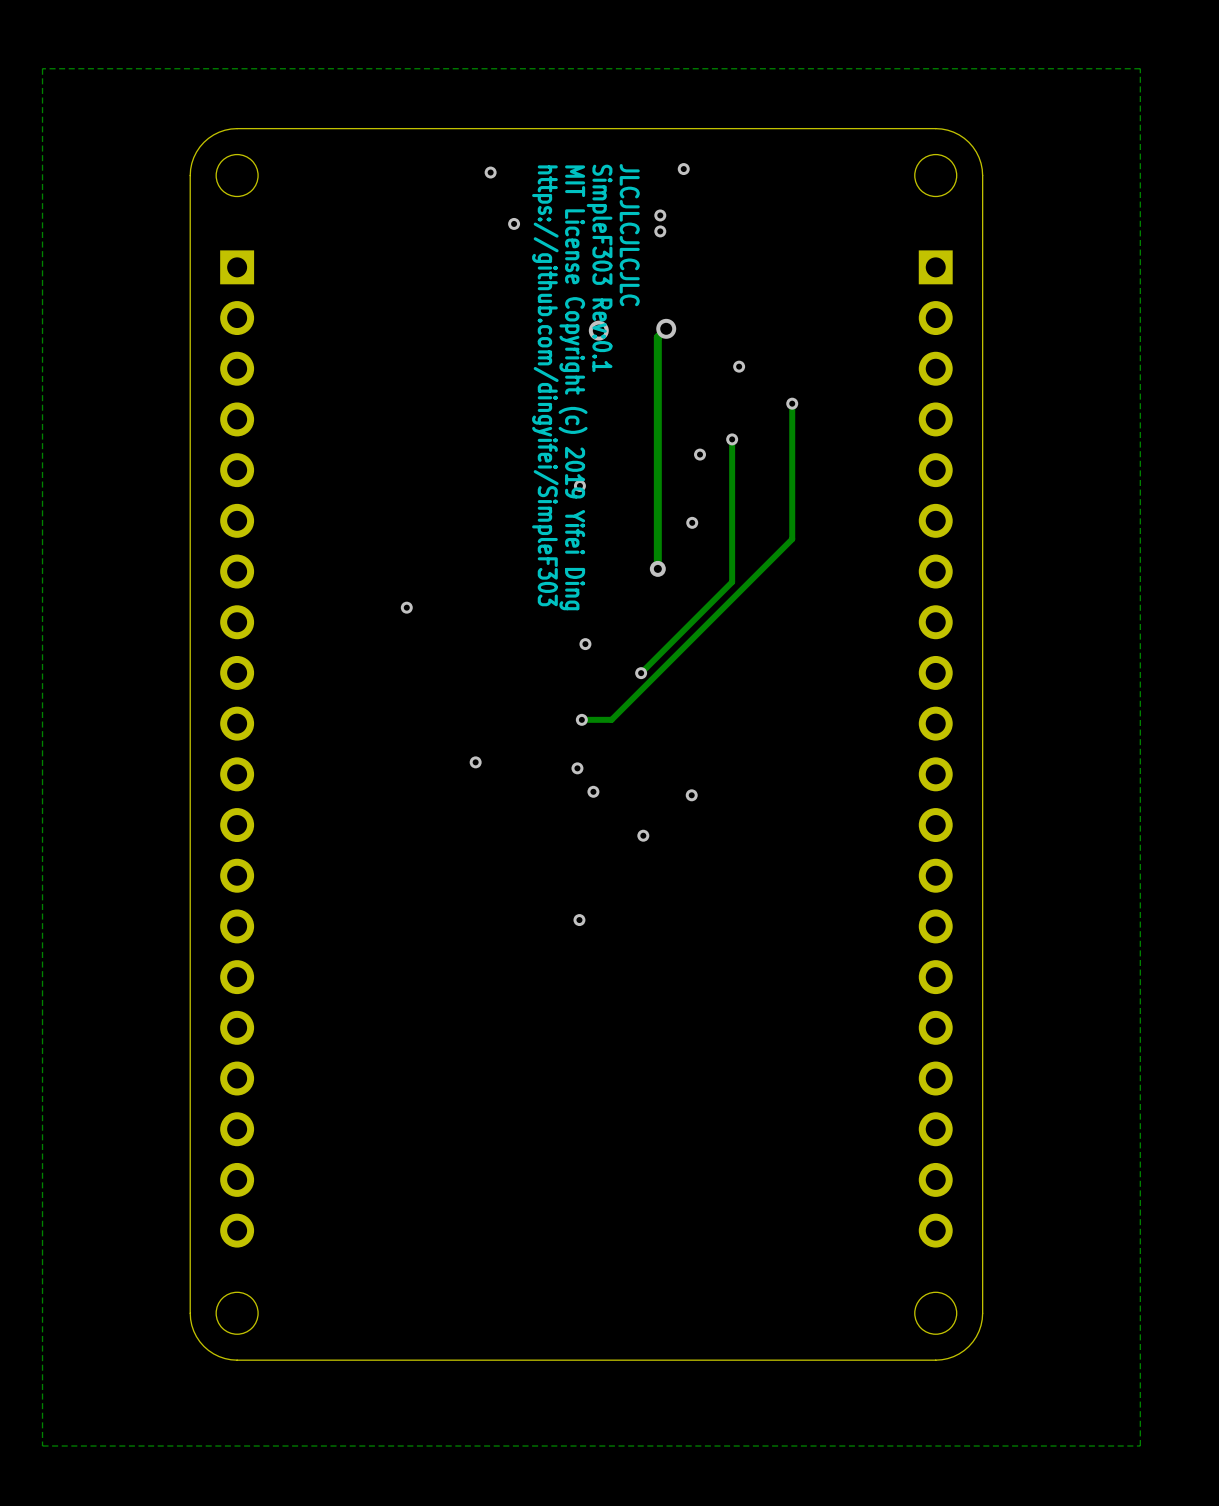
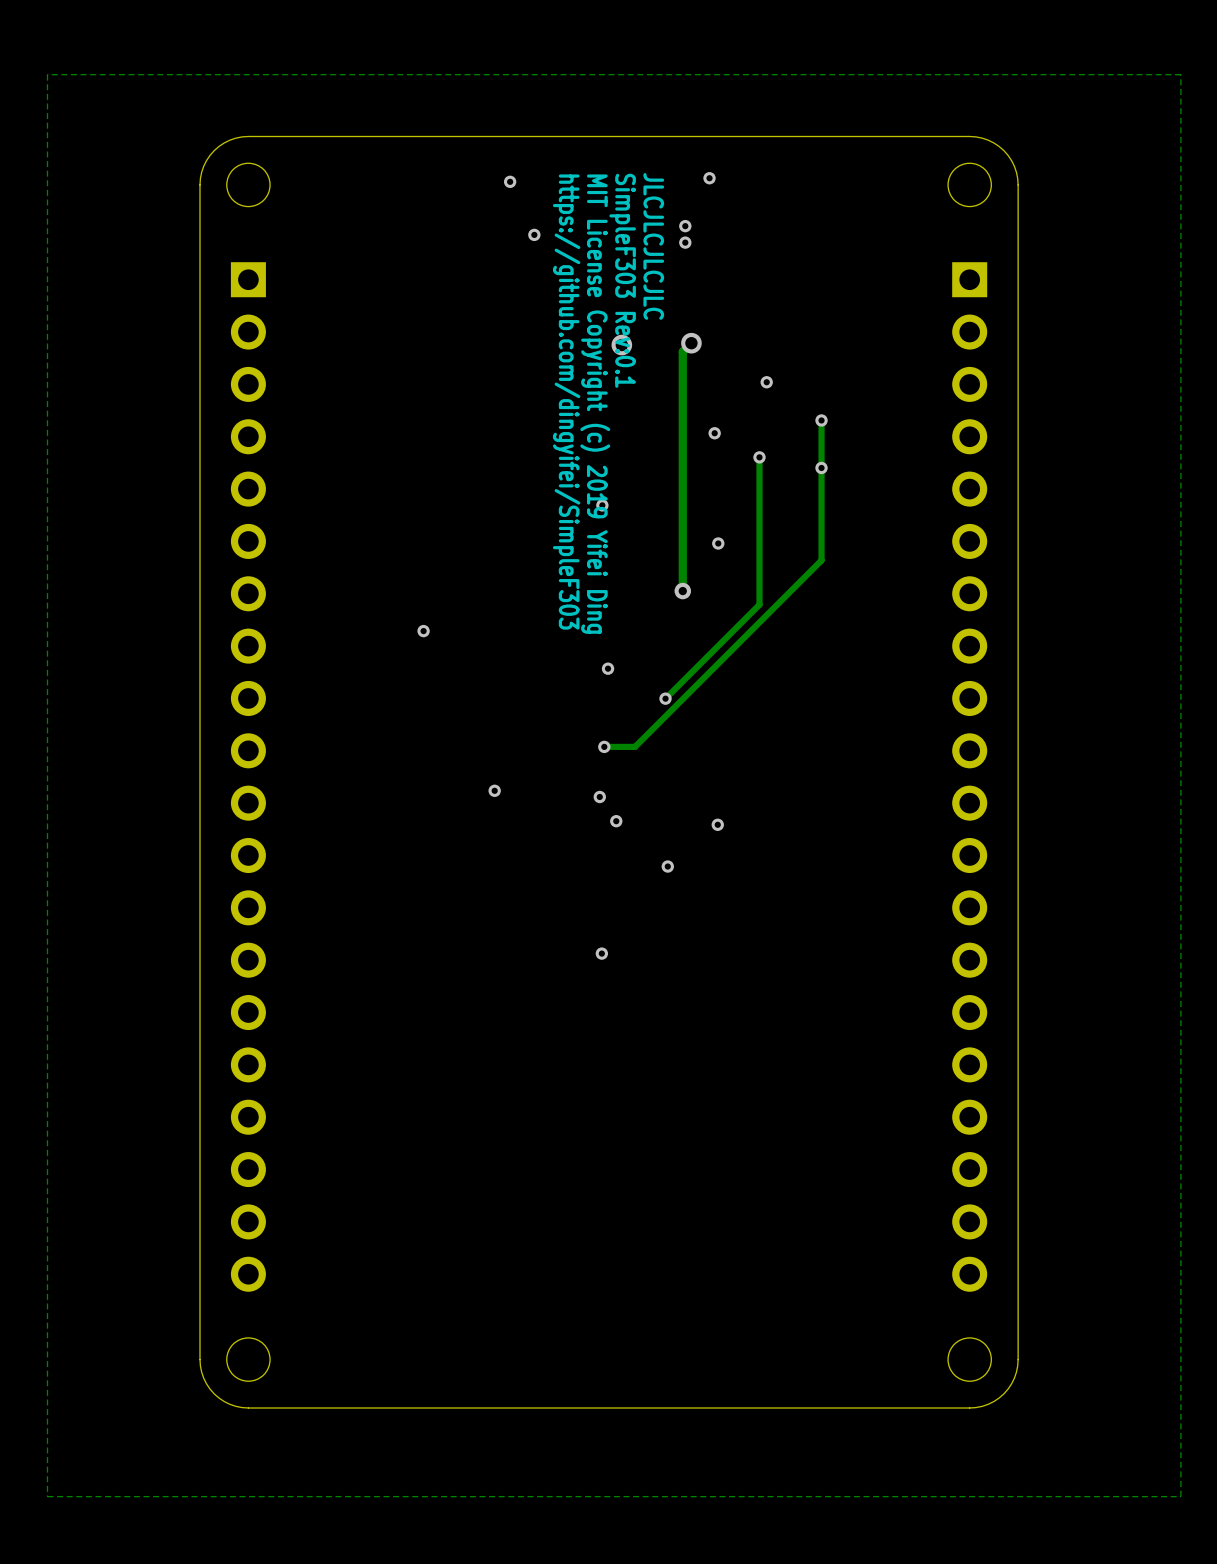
via: none -> (821, 467)
via position: (700, 454) -> (714, 433)

